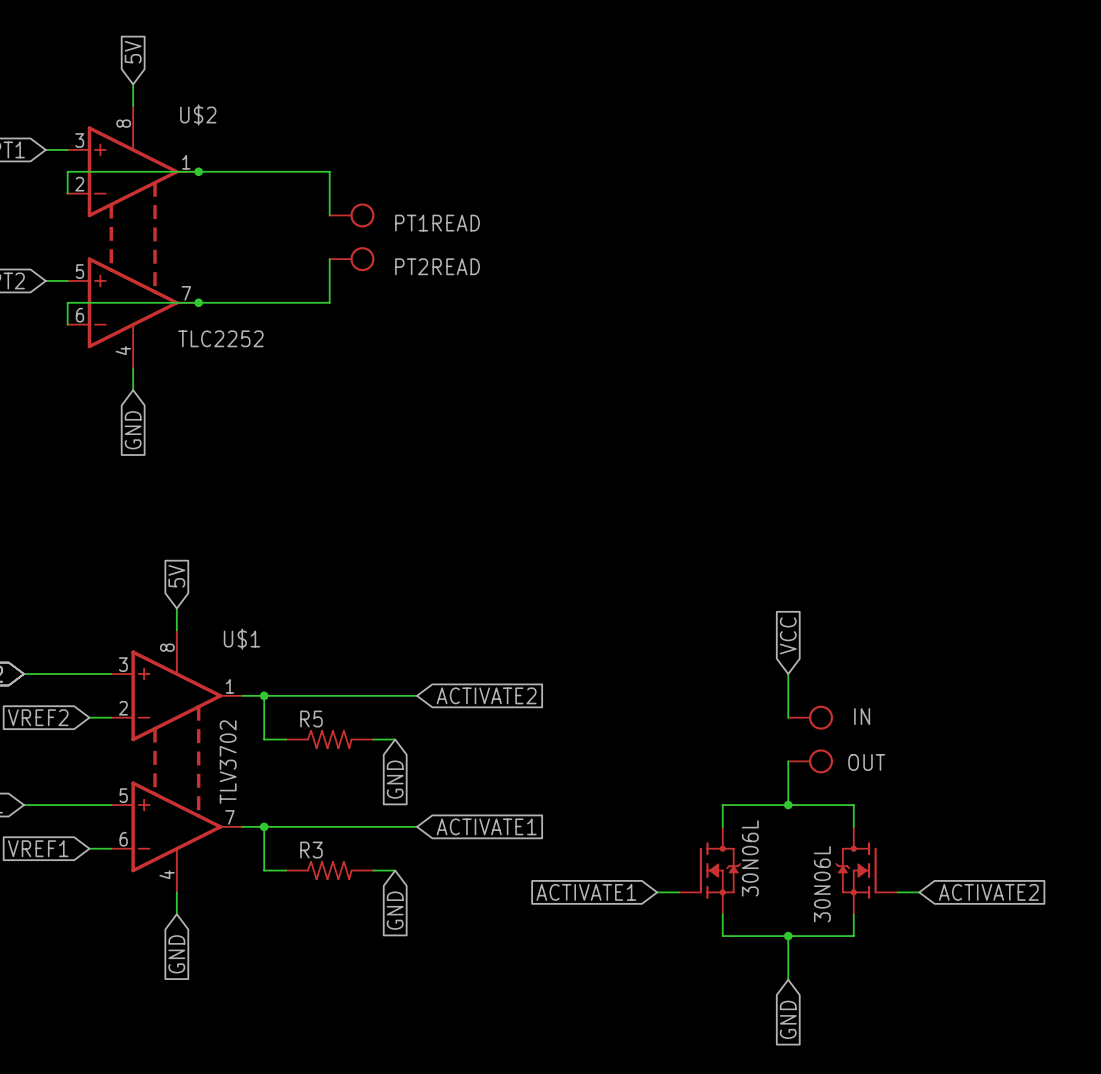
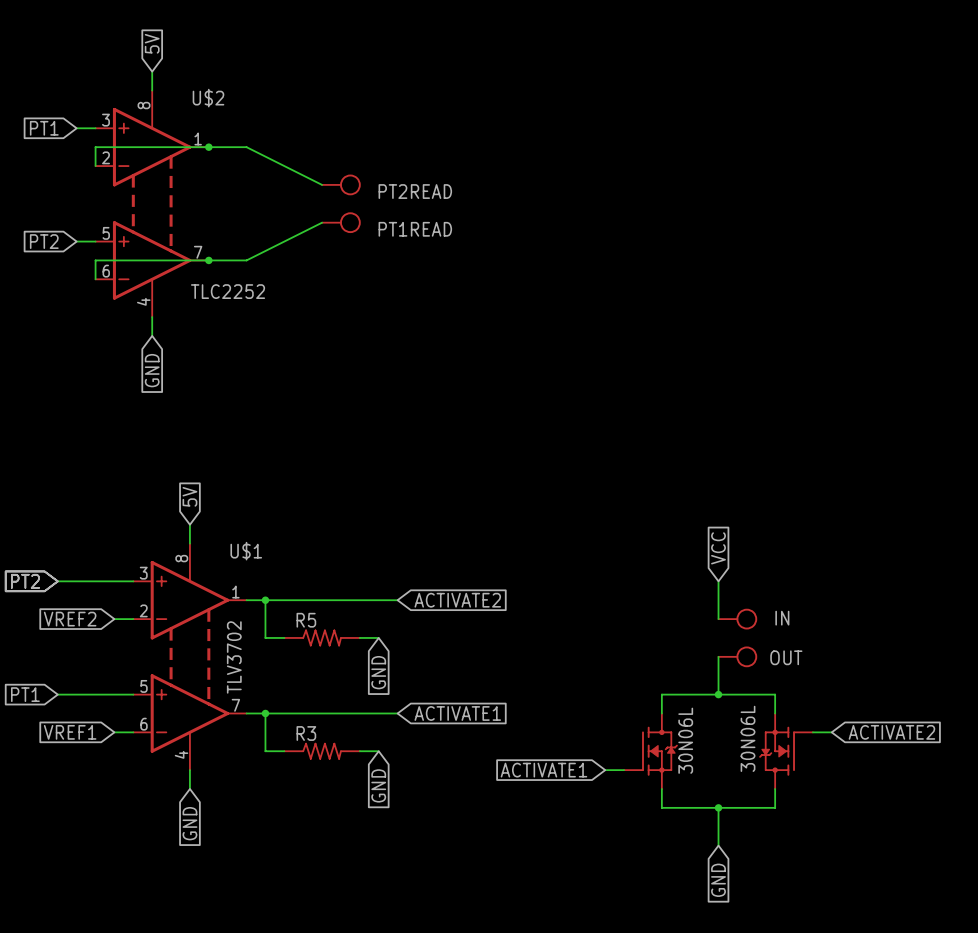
wire: (242, 171) (329, 171) (329, 215) -> (246, 147) (322, 184)
part text: PT1READ (437, 223) -> none
part text: none -> PT2READ (415, 191)
wire: (329, 259) (329, 302) (242, 302) -> (322, 222) (246, 260)
part text: none -> PT1READ (415, 229)
part text: PT2READ (437, 266) -> none
part flip: as is (856, 870) -> up-down (777, 751)
wire: (897, 892) (919, 892) -> (812, 732) (831, 732)
global label position: ACTIVATE2 (988, 892) -> ACTIVATE2 (891, 732)

